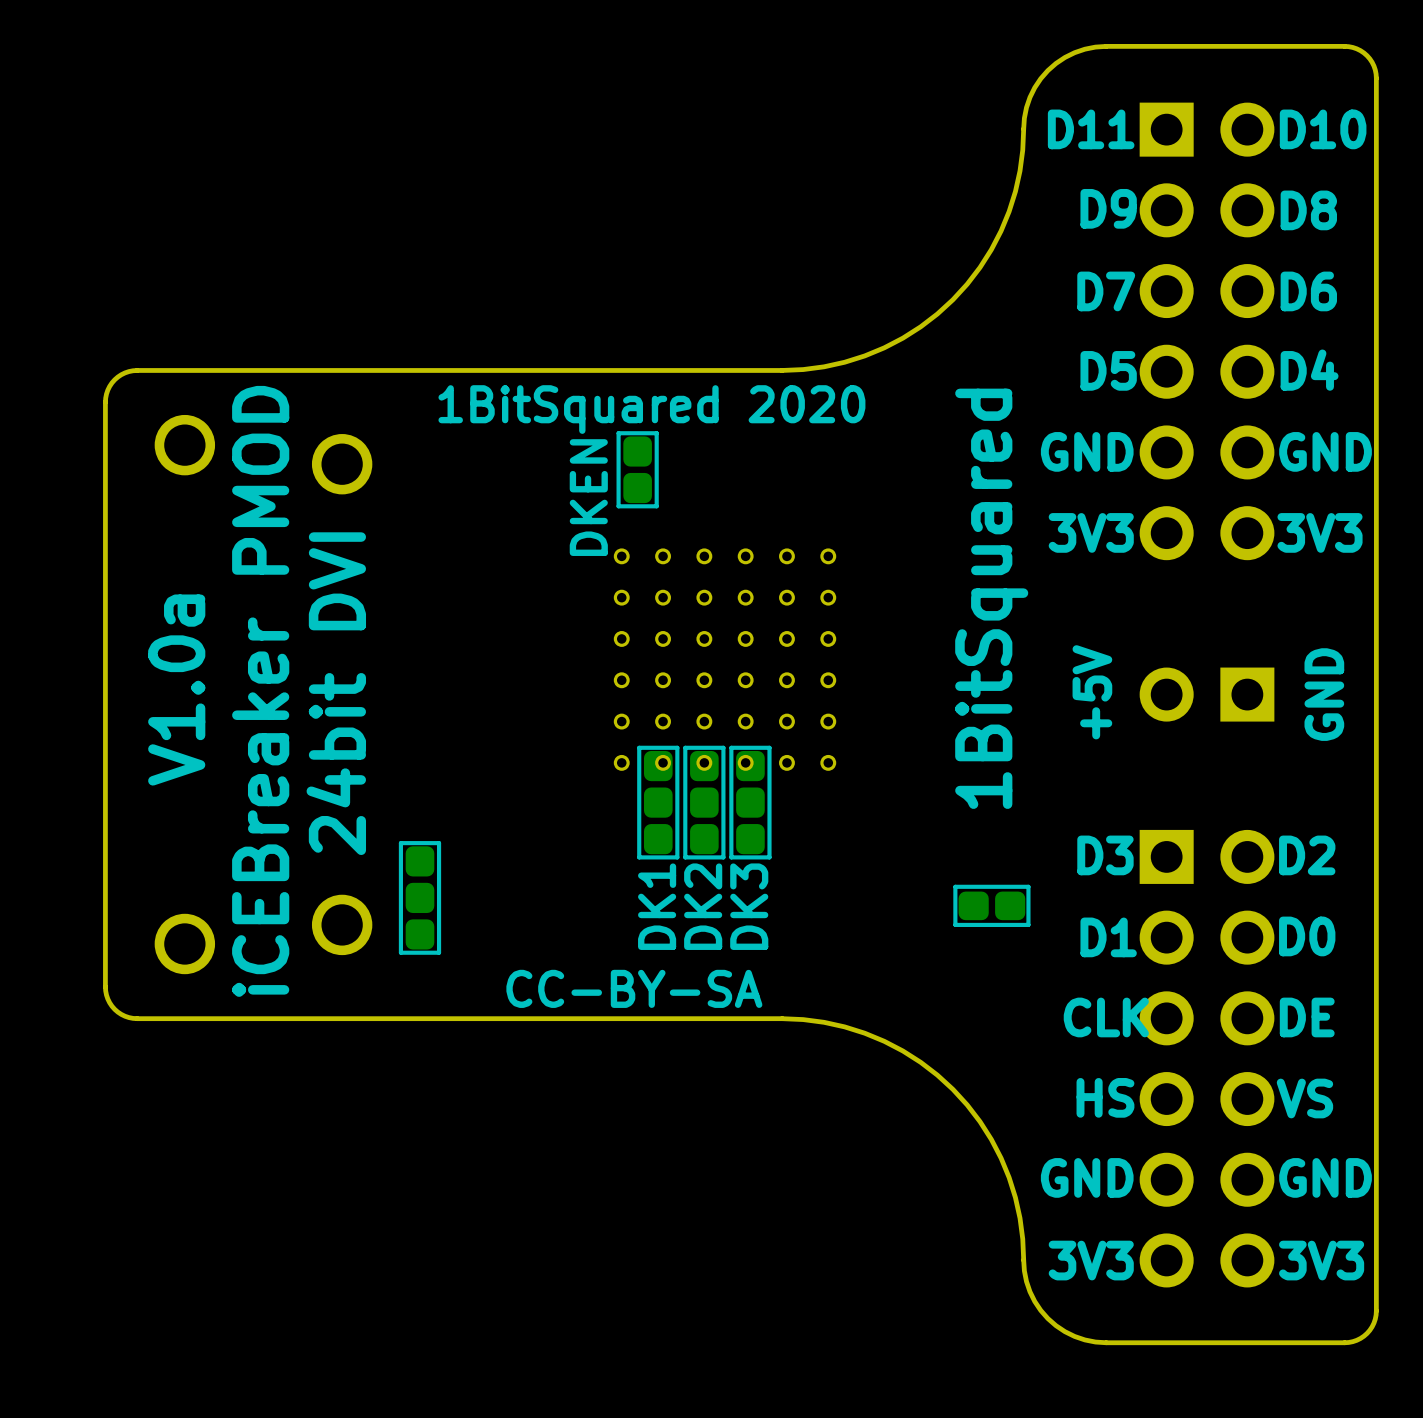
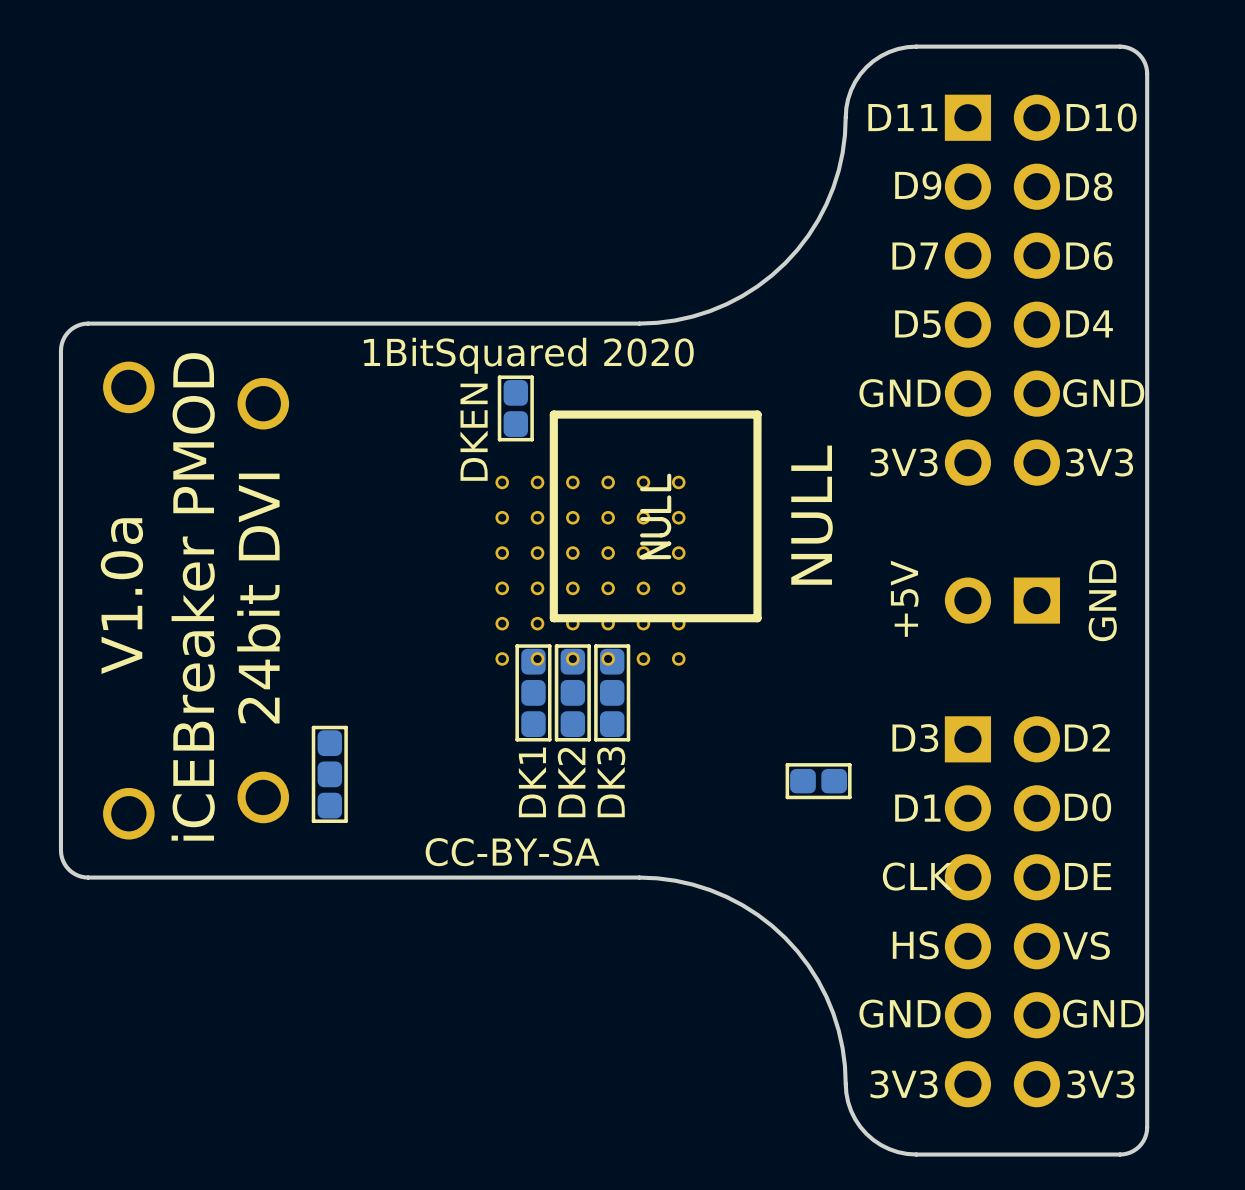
drawing: none -> [549, 410, 762, 623]
text: 1BitSquared (991, 598) -> NULL (812, 515)

